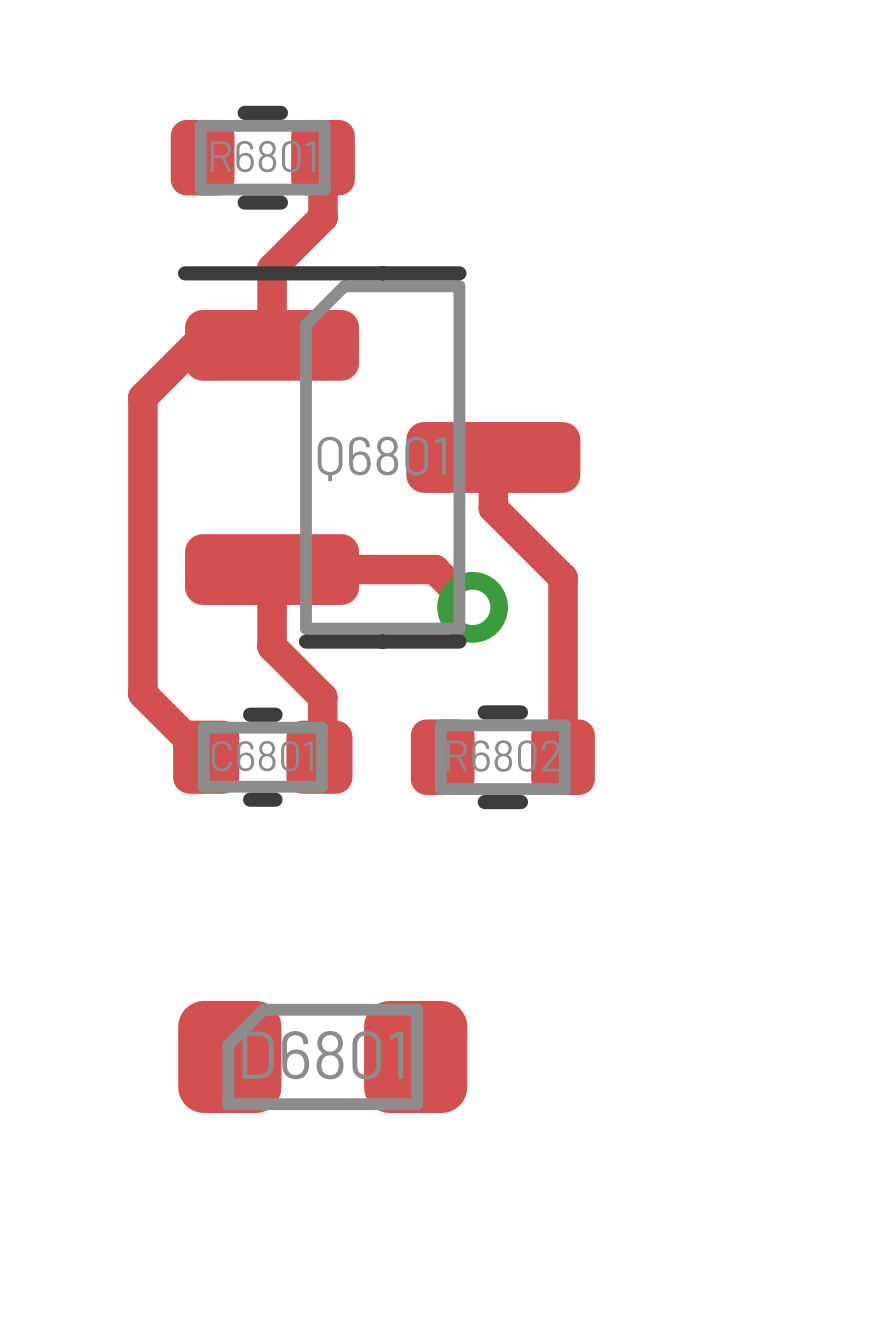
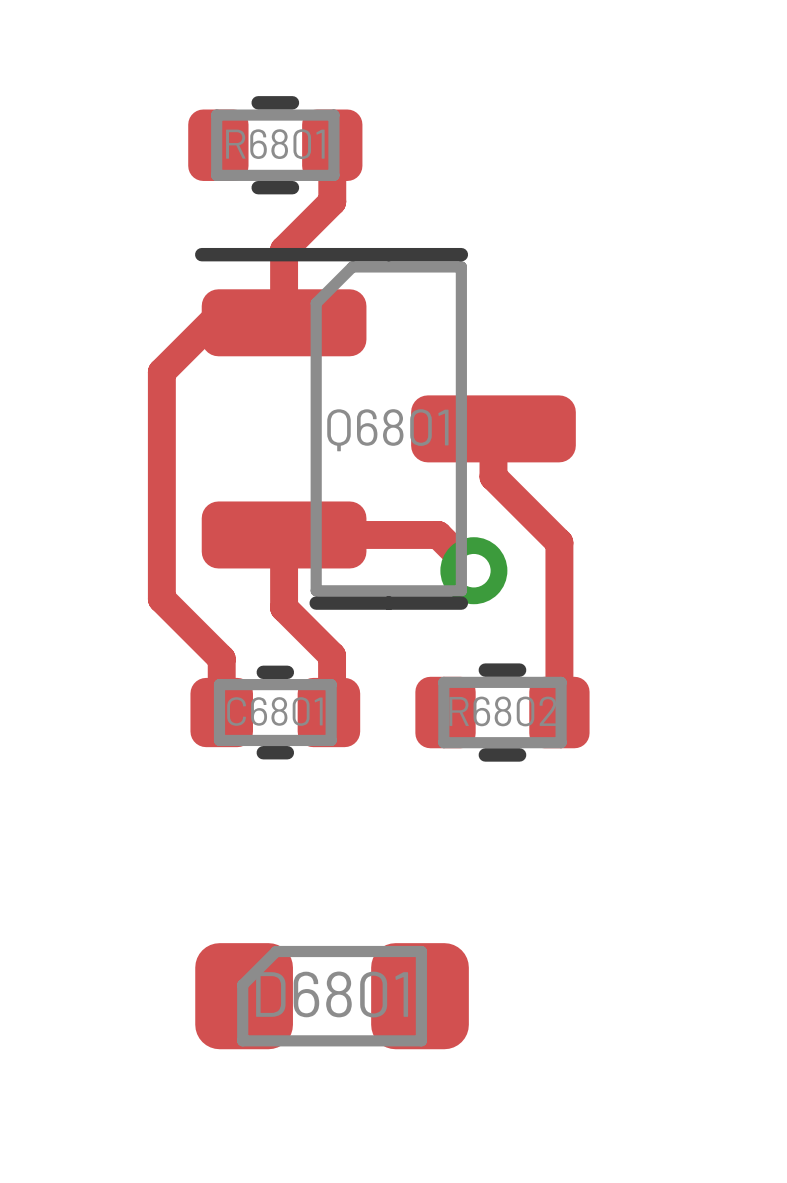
track: (142, 637) (142, 693) (206, 757) -> (161, 599) (221, 658) (221, 712)

